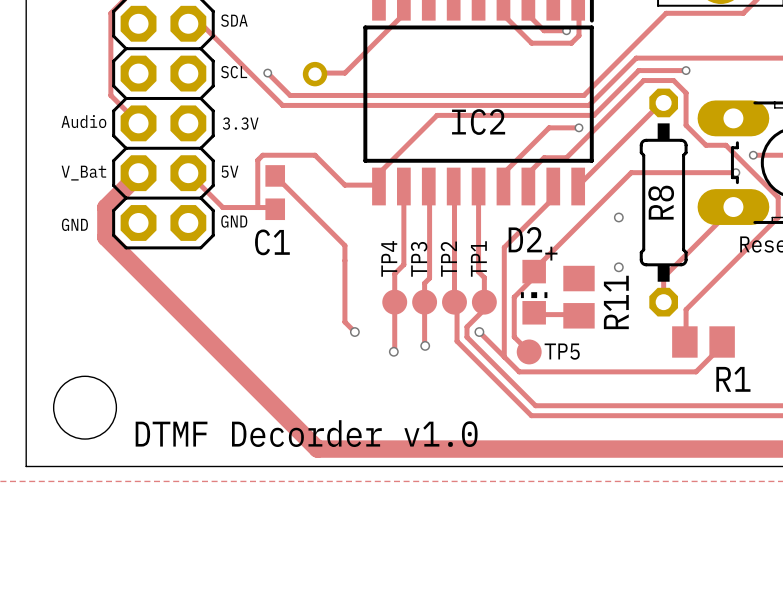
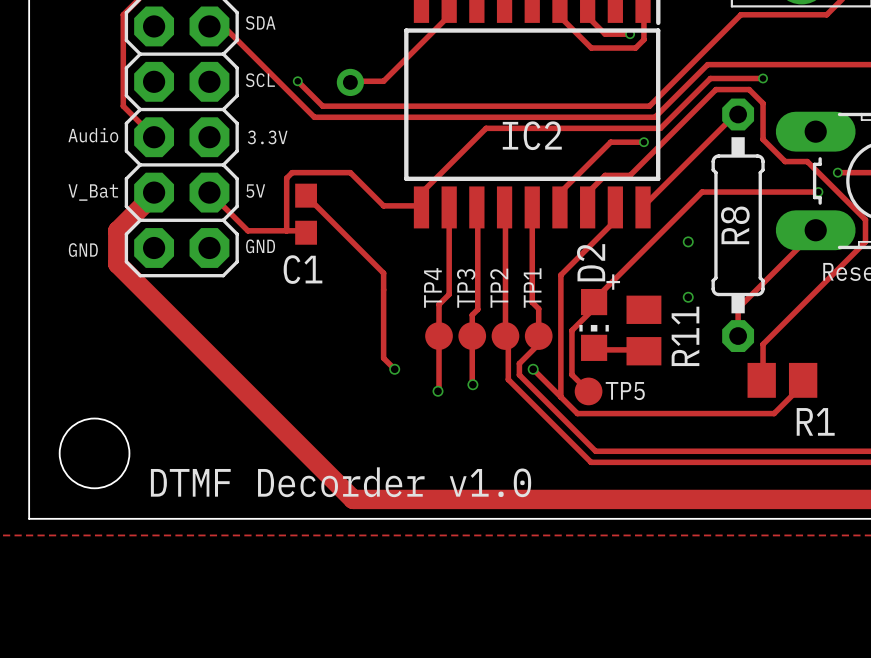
D2 name rotation: 0° (525, 239) -> 90° counterclockwise (591, 262)

